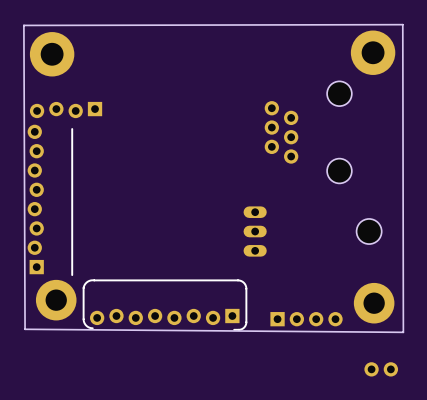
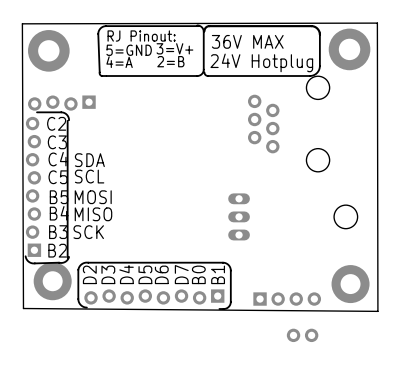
line: none -> (197, 25) (201, 27) (203, 31) (203, 70) (200, 75) (106, 76)
line: none -> (198, 26) (102, 27) (98, 33) (99, 73) (101, 75) (106, 76)
line: none -> (204, 31) (209, 26) (311, 26) (317, 28) (319, 34)
line: none -> (319, 32) (319, 67) (313, 75) (208, 76) (204, 72)
text: none -> RJ Pinout: (141, 36)
text: none -> 36V MAX (247, 41)
text: none -> 3=V+ (174, 48)
text: none -> 5=GND (129, 50)
text: none -> 2=B (170, 61)
text: none -> 4=A (119, 62)
text: none -> 24V Hotplug (261, 62)
line: none -> (37, 112) (63, 112) (67, 115) (69, 120)
text: none -> C2 (56, 123)
text: none -> C3 (57, 142)
text: none -> C4 (58, 159)
text: none -> SDA (89, 160)
text: none -> SCL (89, 176)
text: none -> C5 (58, 177)
text: none -> B5 (59, 197)
text: none -> MOSI (93, 197)
text: none -> B4 (59, 213)
text: none -> MISO (93, 214)
text: none -> B3 (58, 232)
text: none -> SCK (88, 232)
text: none -> B2 (57, 250)
line: none -> (25, 256) (27, 261) (33, 263) (62, 262) (69, 256)
text: none -> D2 (89, 274)
text: none -> D3 (108, 274)
text: none -> D4 (126, 274)
text: none -> D5 (145, 274)
text: none -> D6 (161, 274)
text: none -> D7 (181, 274)
text: none -> B0 (198, 274)
text: none -> B1 (218, 274)
part position: (381, 369) -> (302, 335)

